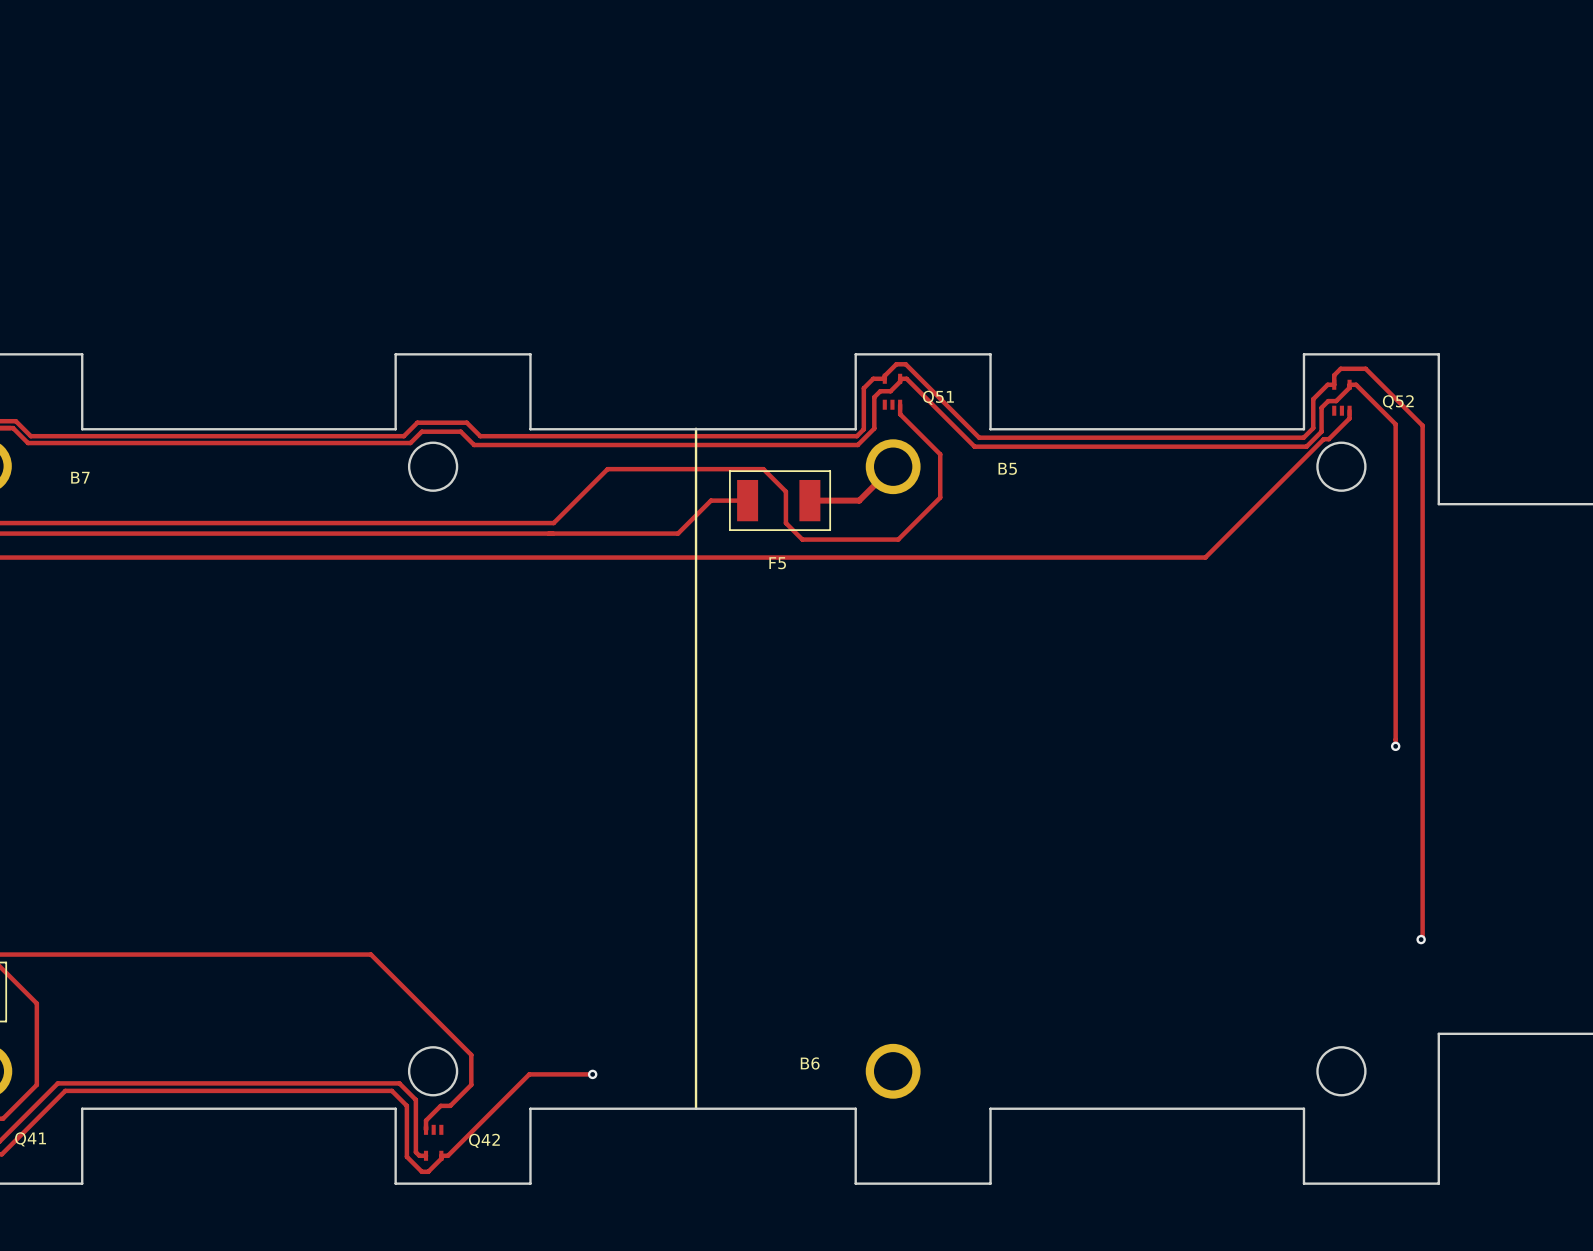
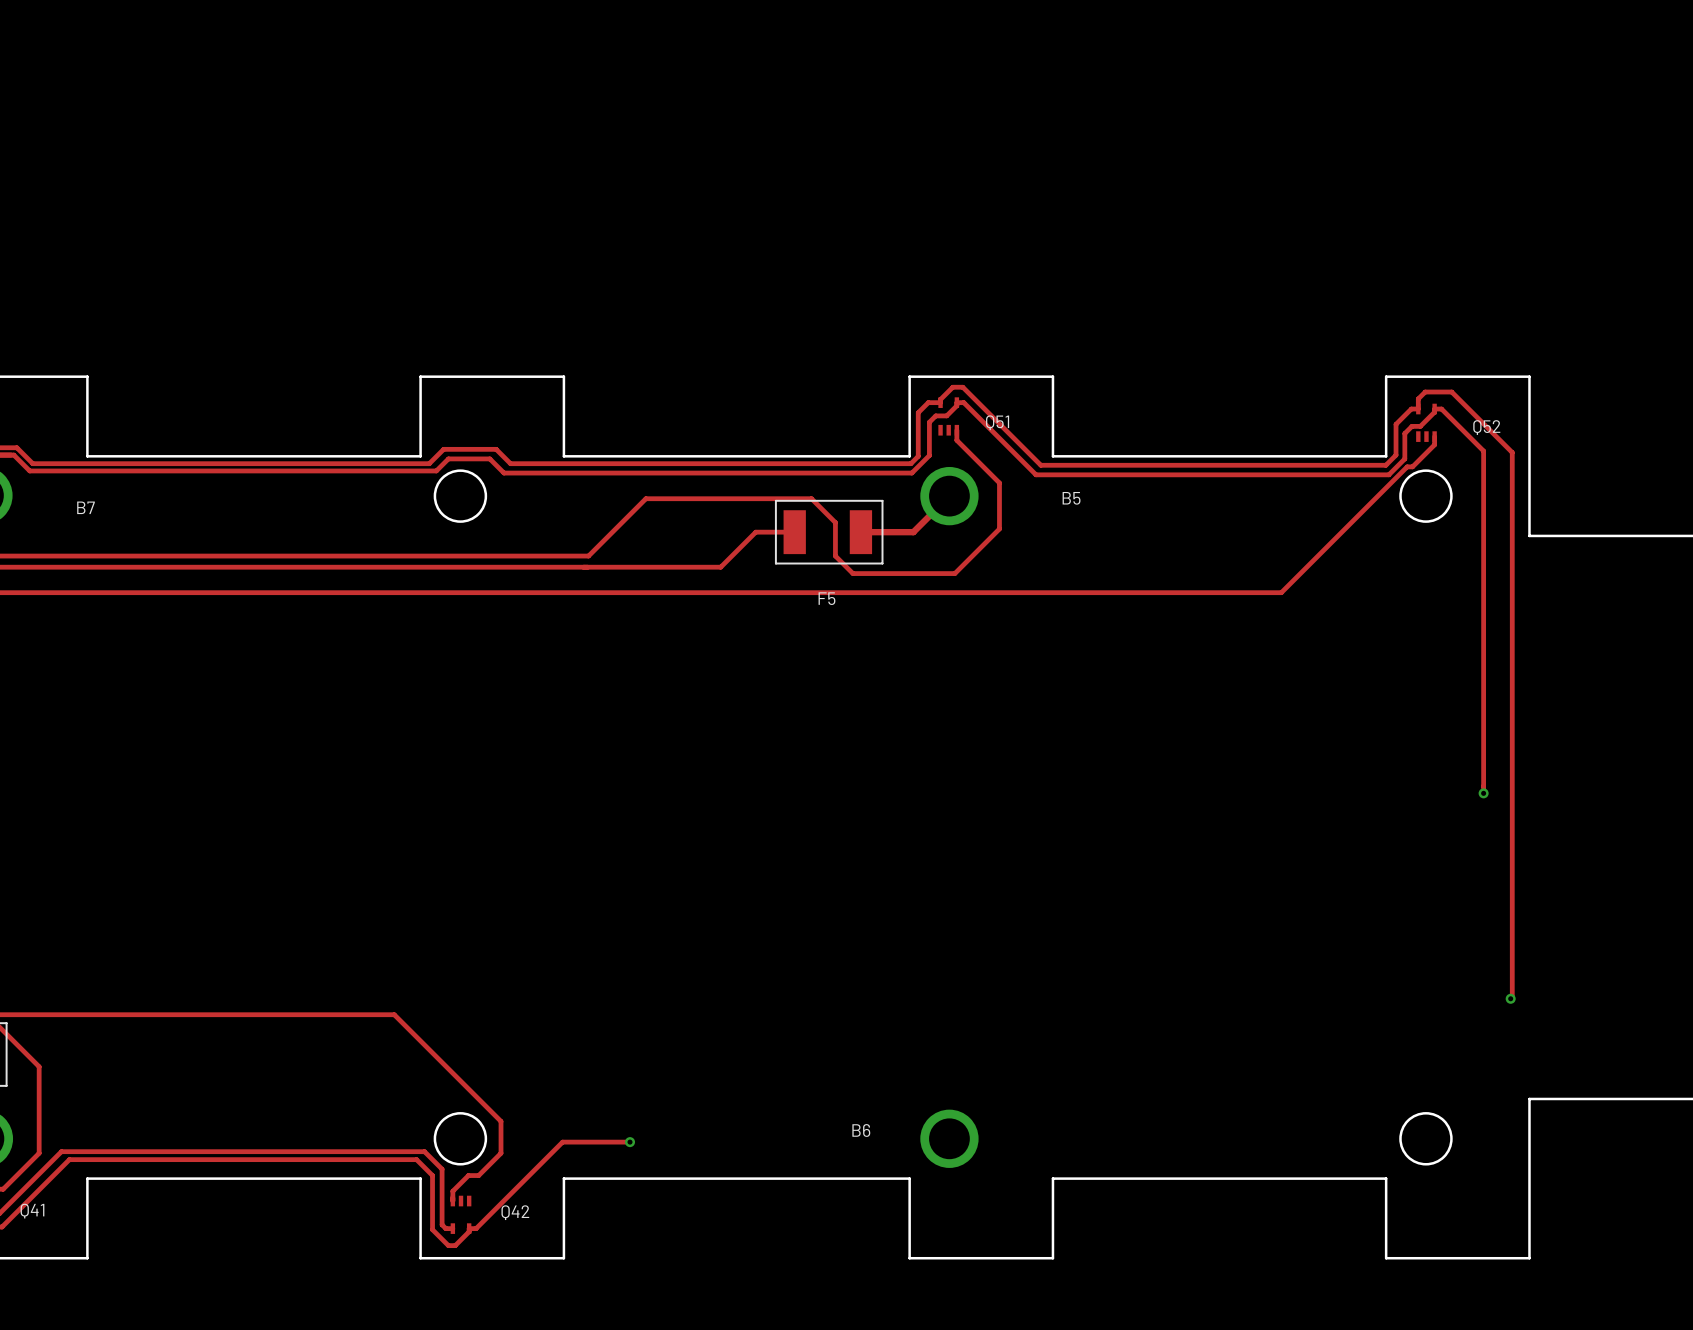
line: (696, 428) (696, 1108) -> none

